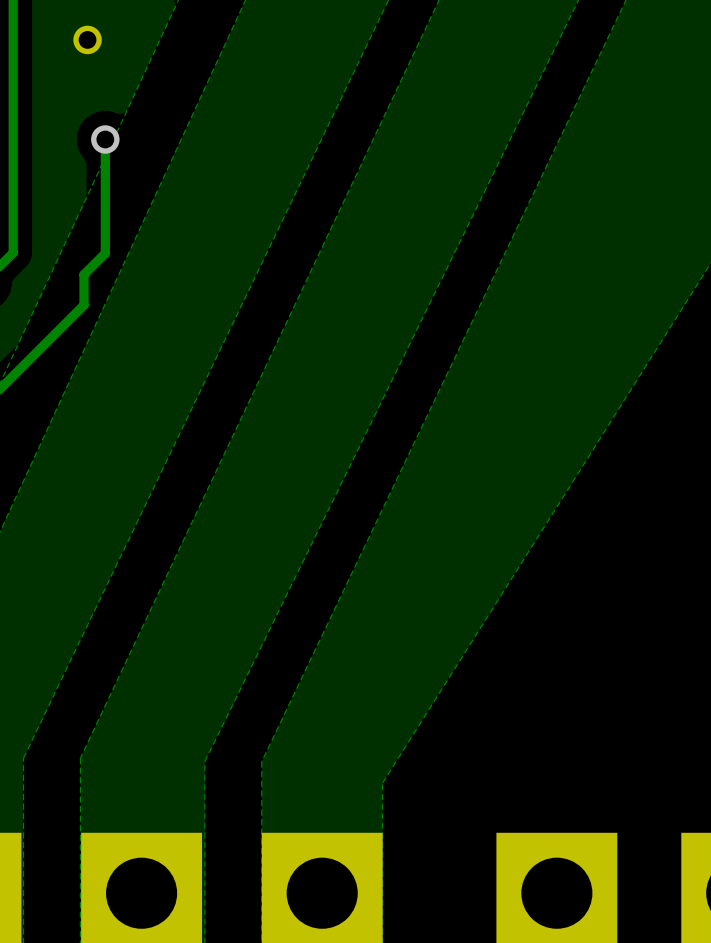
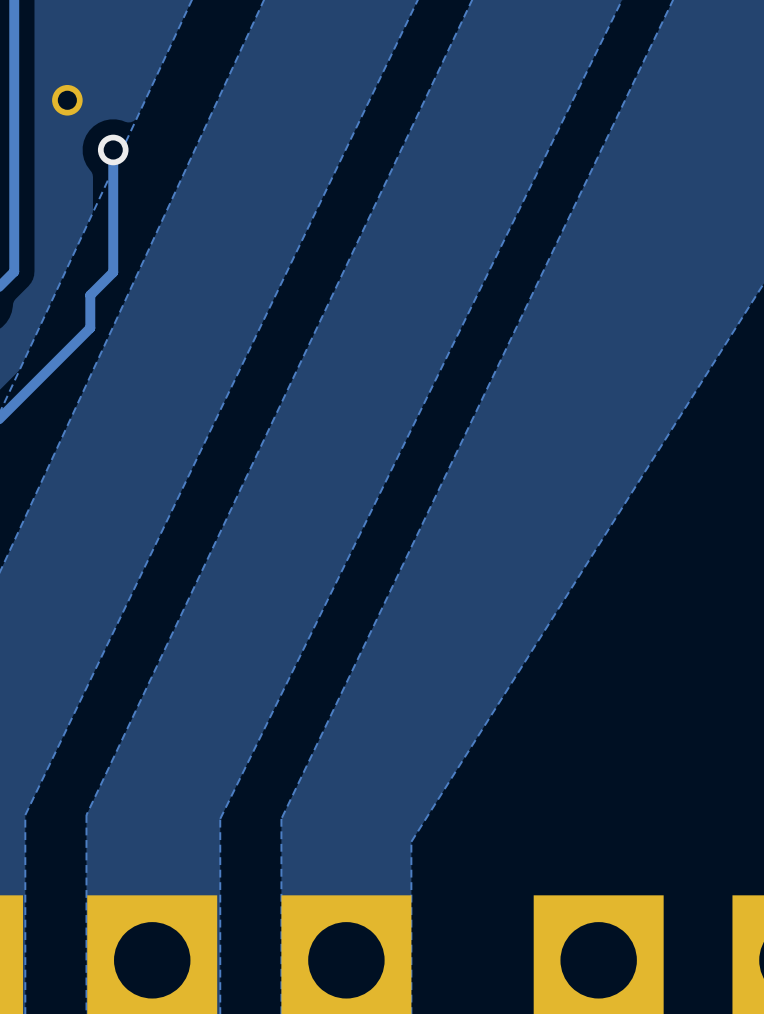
part position: (87, 39) -> (67, 100)

